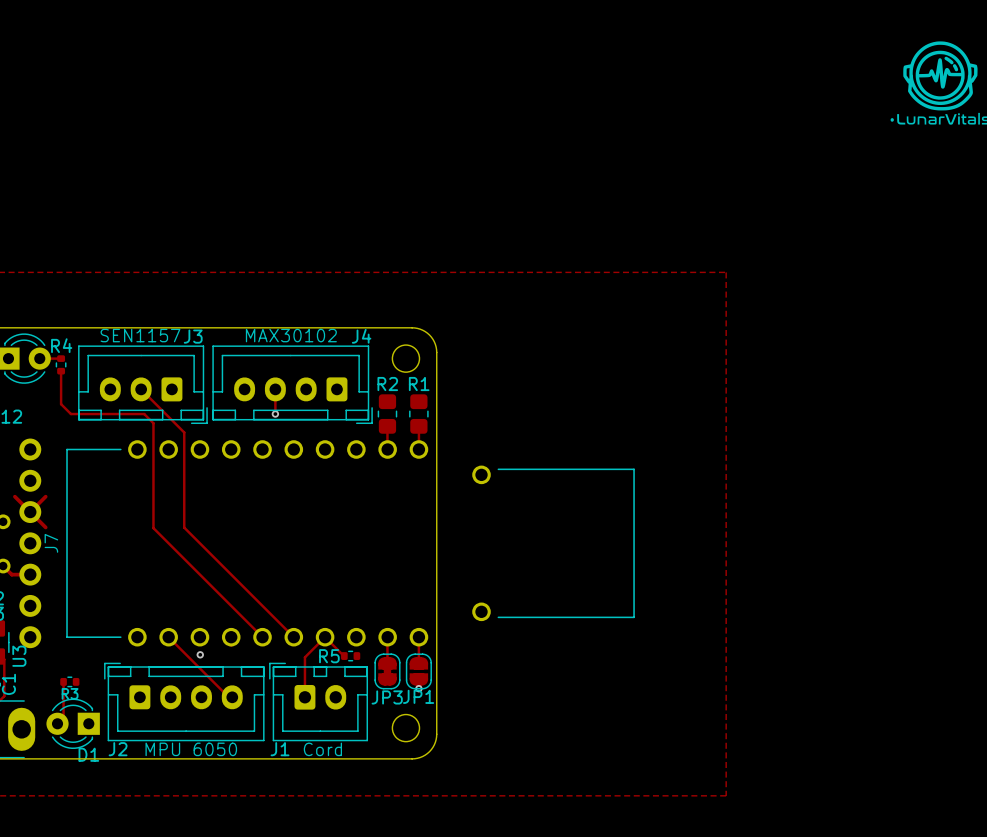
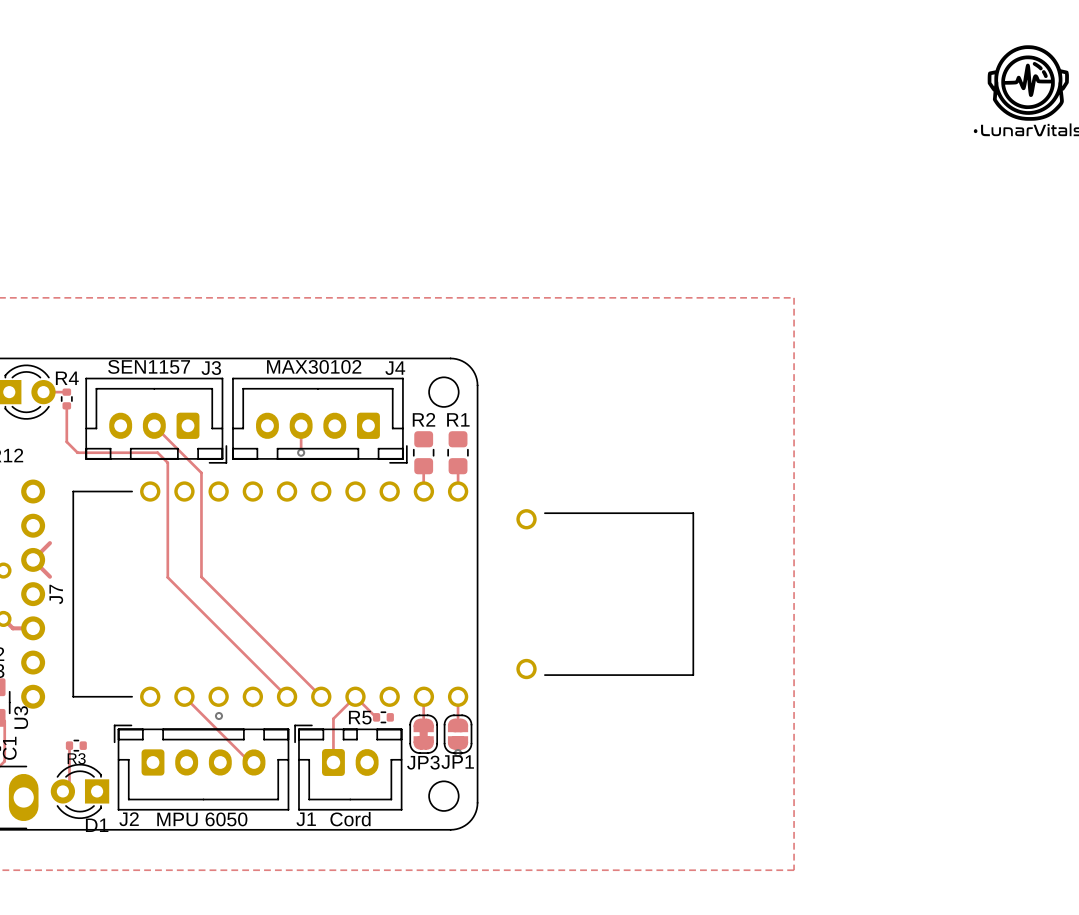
track: (14, 496) (30, 512) -> none

